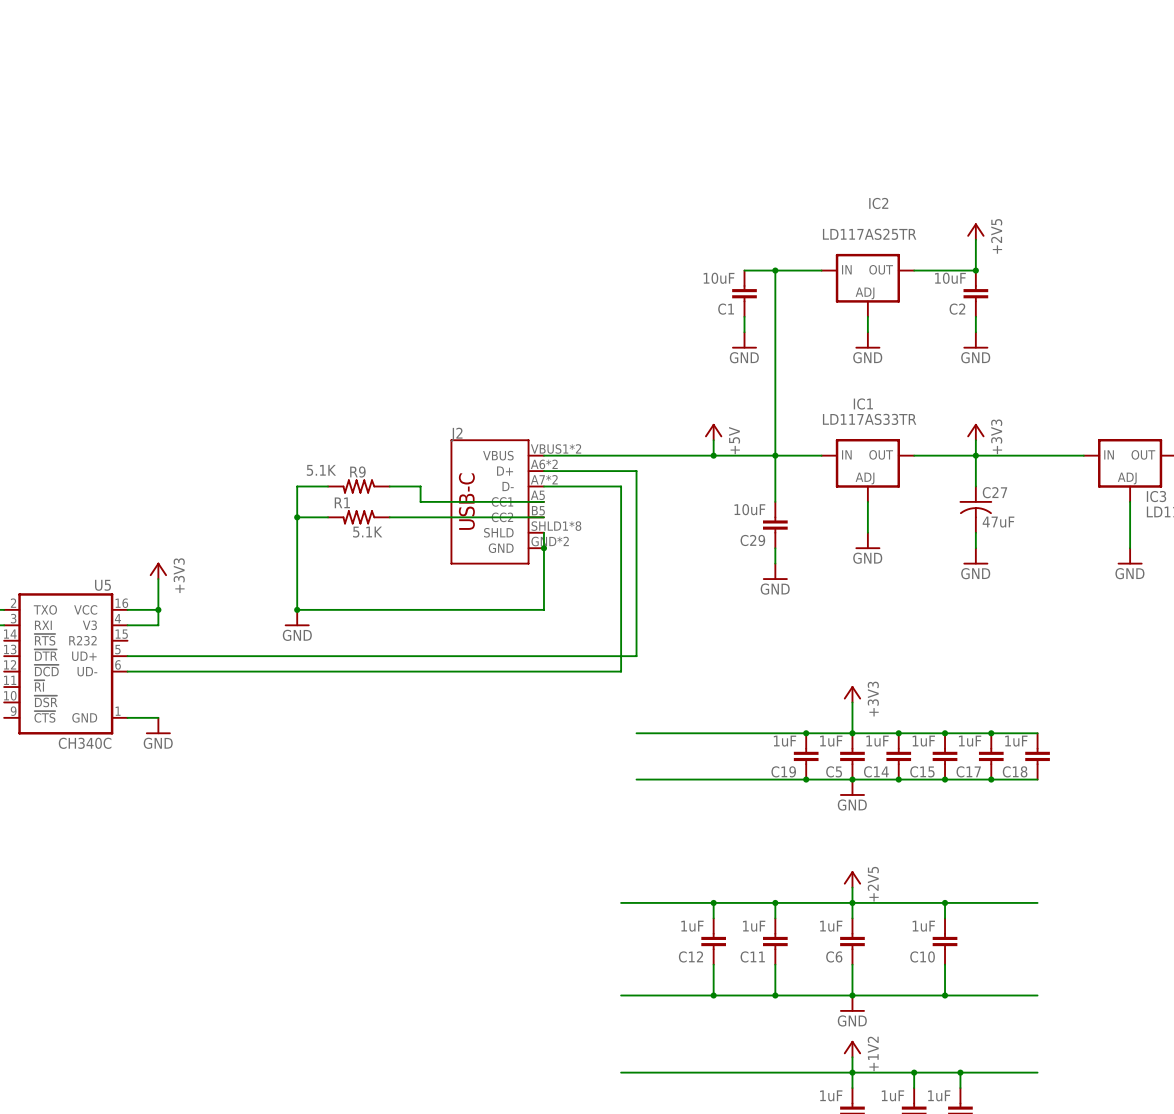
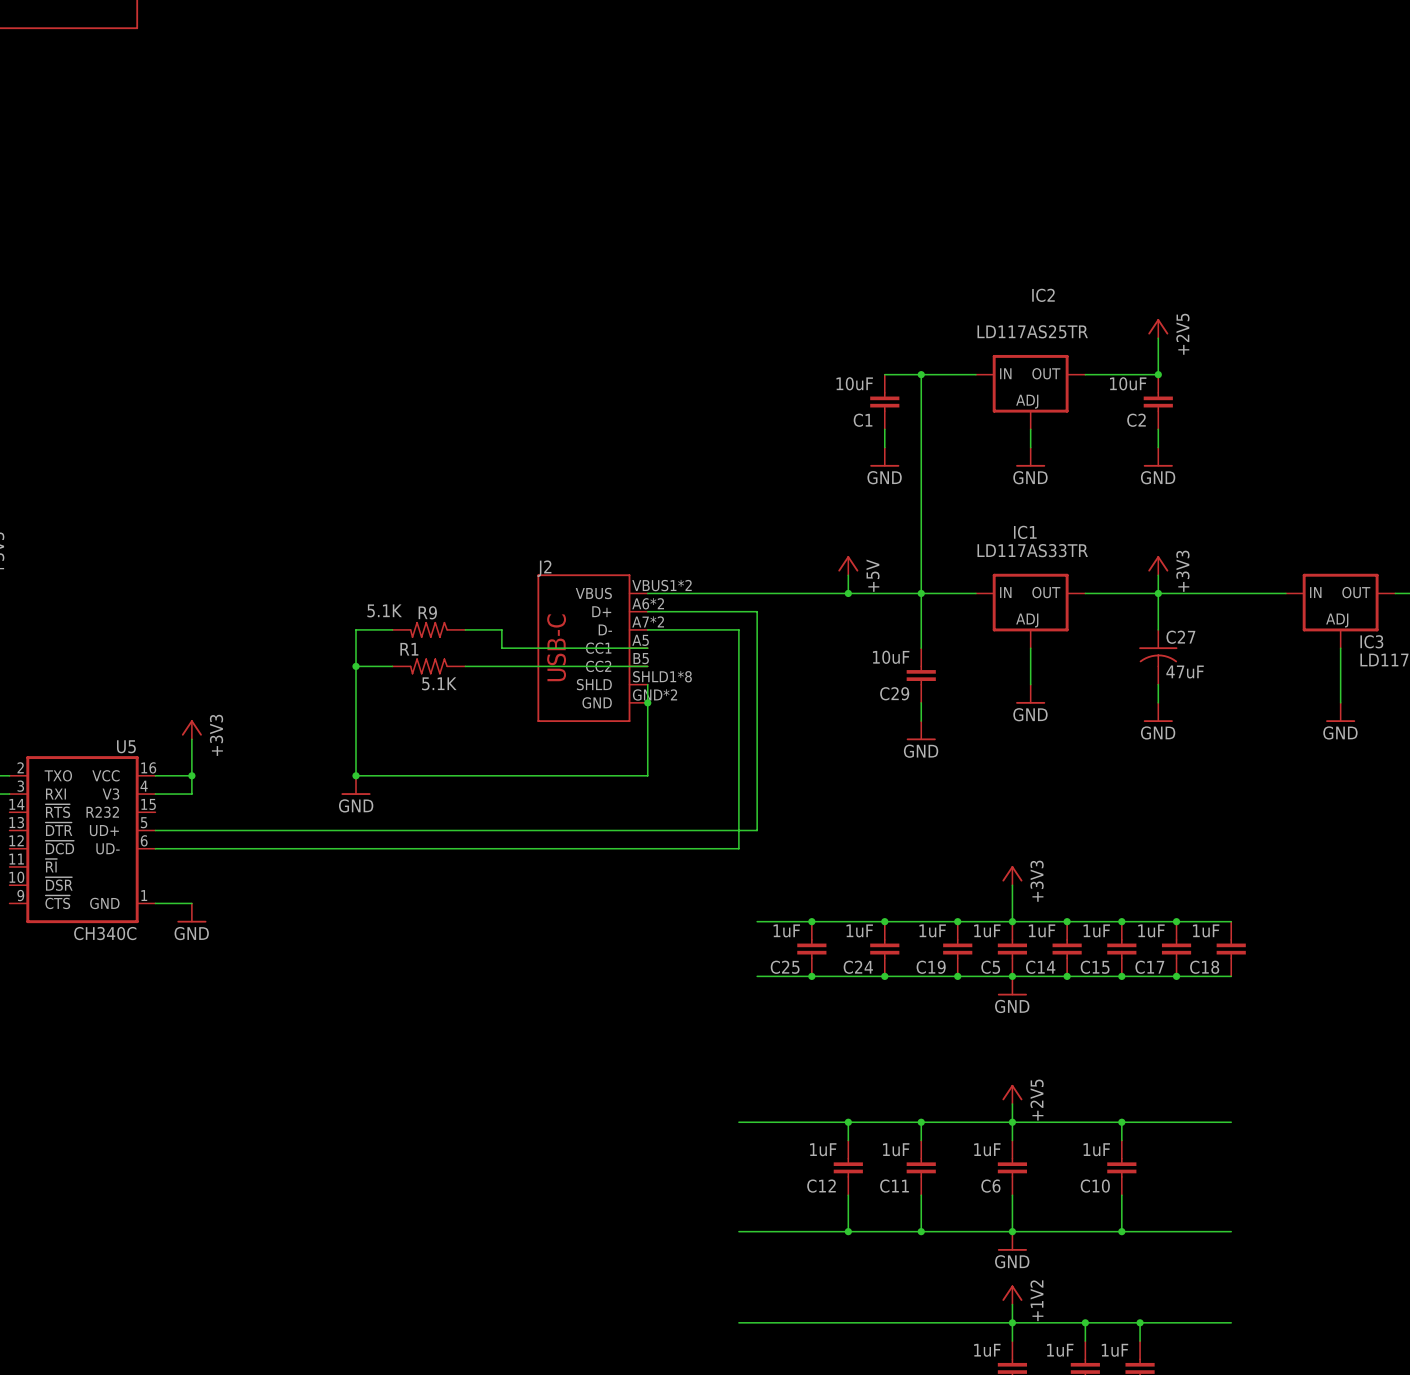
junction: none -> (811, 921)
junction: none -> (884, 921)
C25: none -> 1uF (811, 949)
C24: none -> 1uF (884, 949)
junction: none -> (811, 976)
junction: none -> (884, 976)

